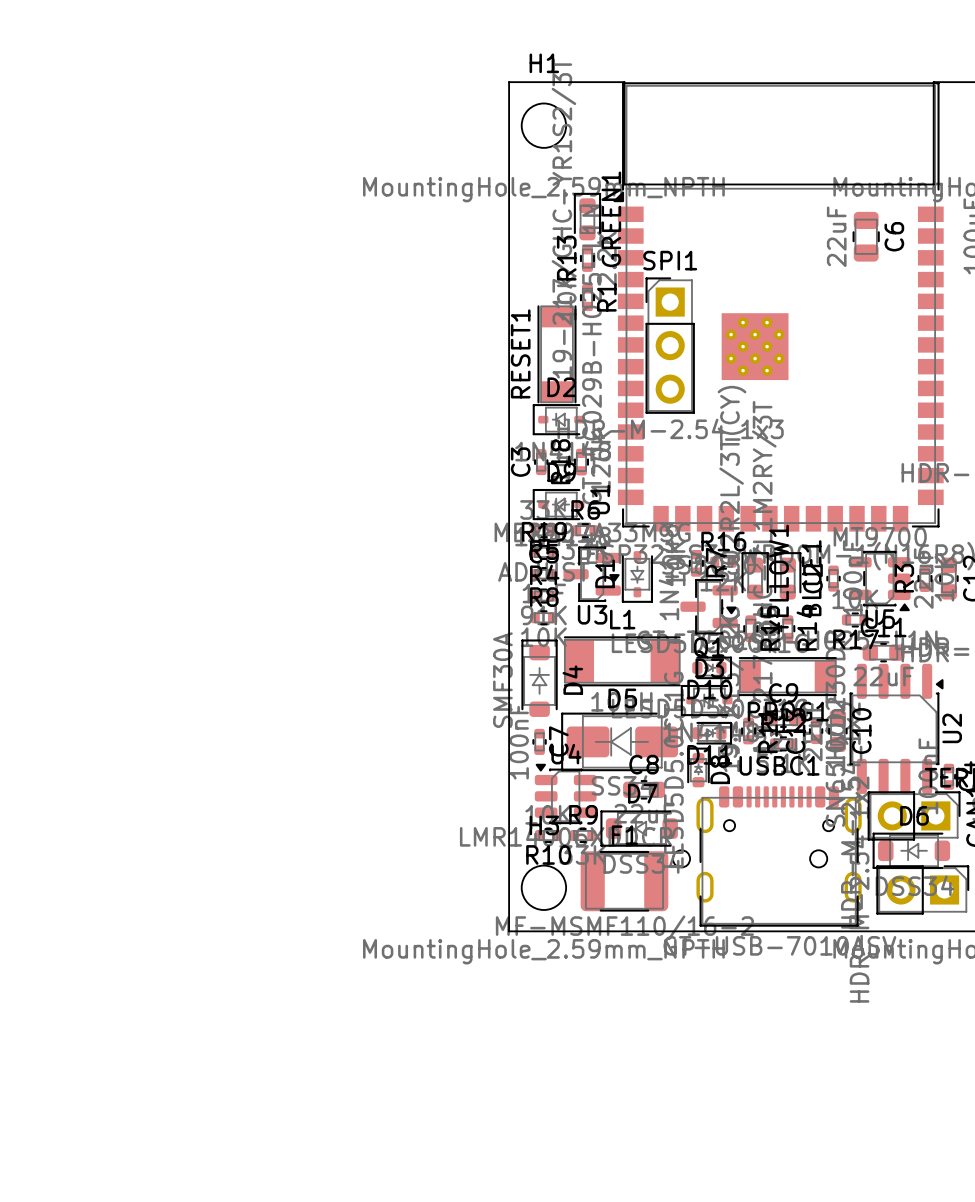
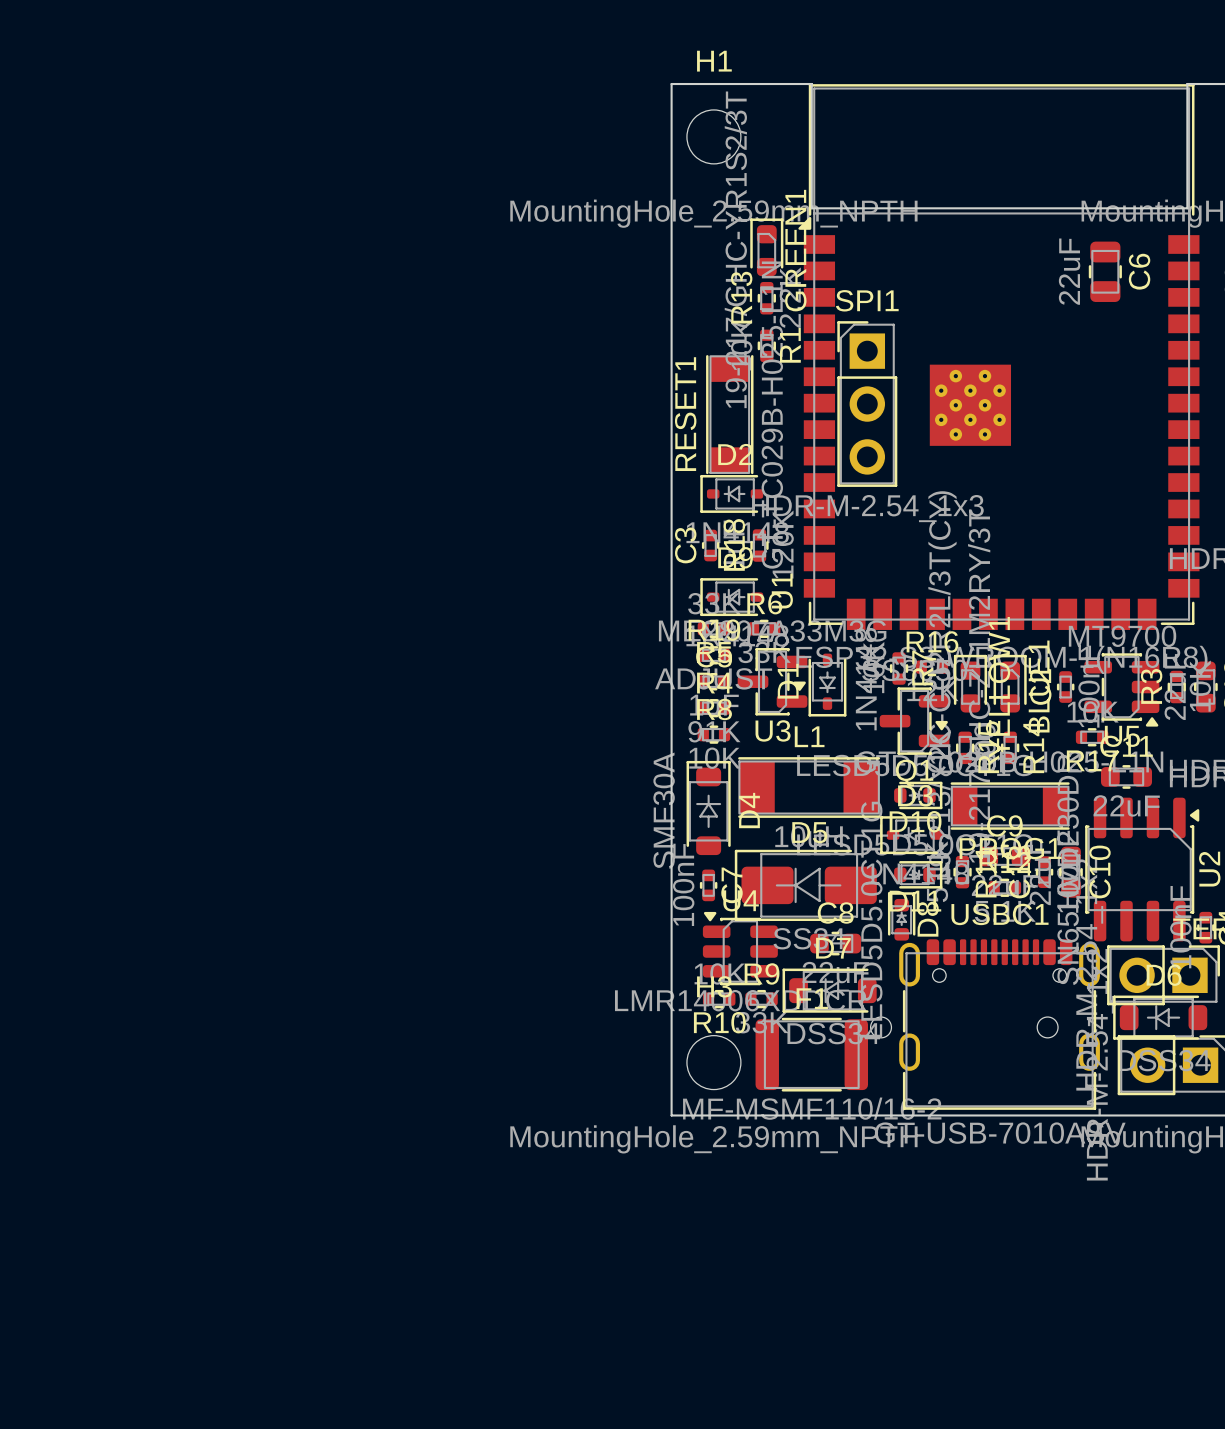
U2 footprint: [849, 663, 944, 794] -> [1085, 797, 1200, 942]
USBC1 footprint: [696, 786, 862, 927] -> [899, 939, 1100, 1110]
F1 footprint: [580, 850, 669, 912] -> [755, 1017, 869, 1092]

